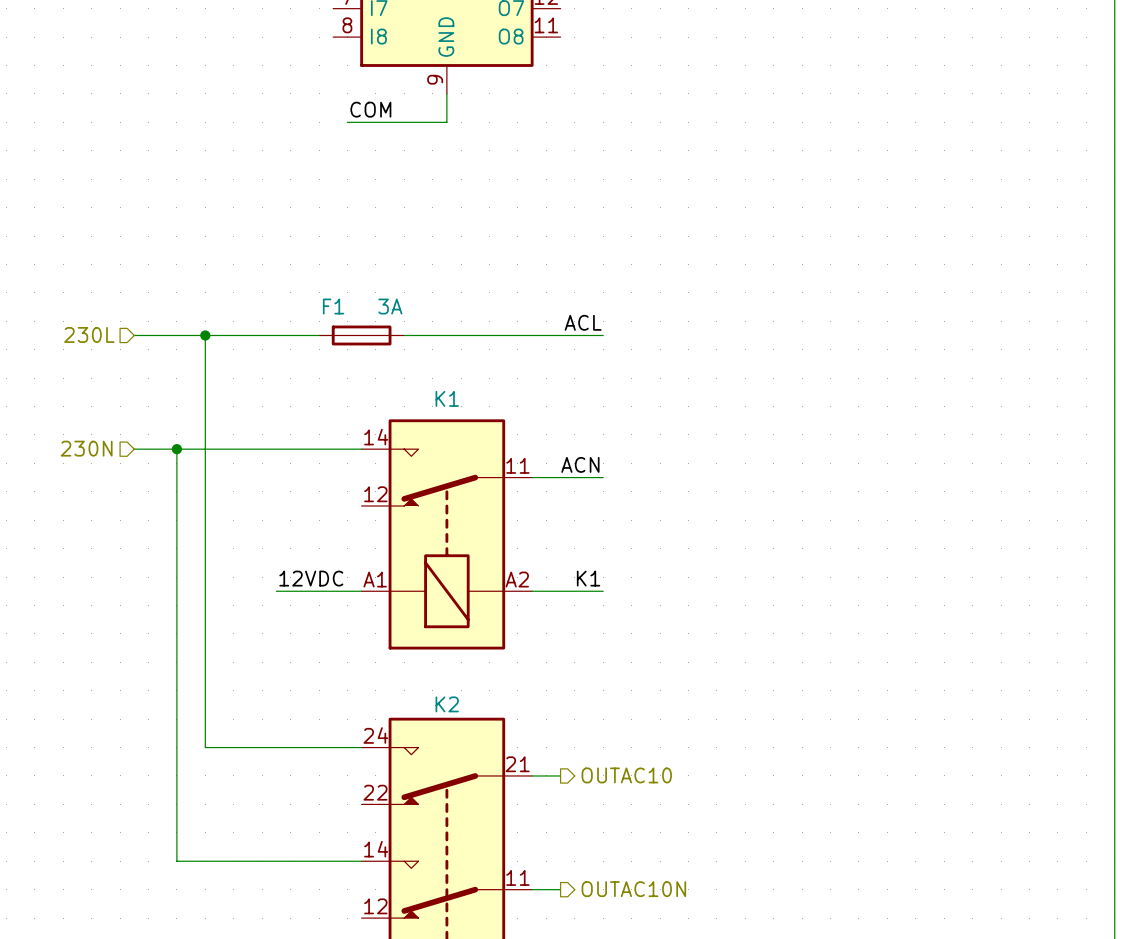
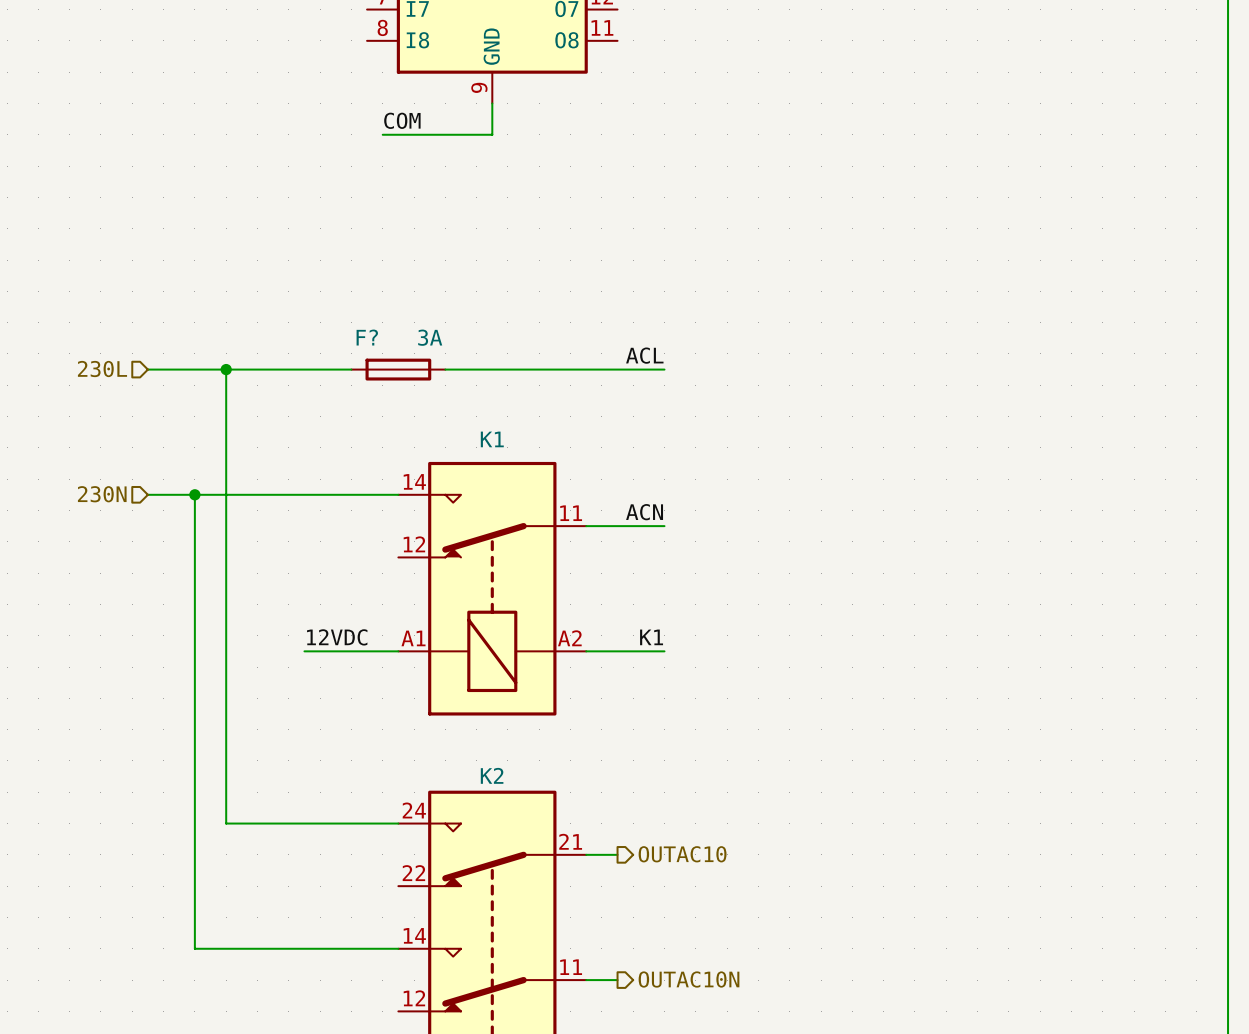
F1 name: F1 (333, 306) -> F? (367, 337)

